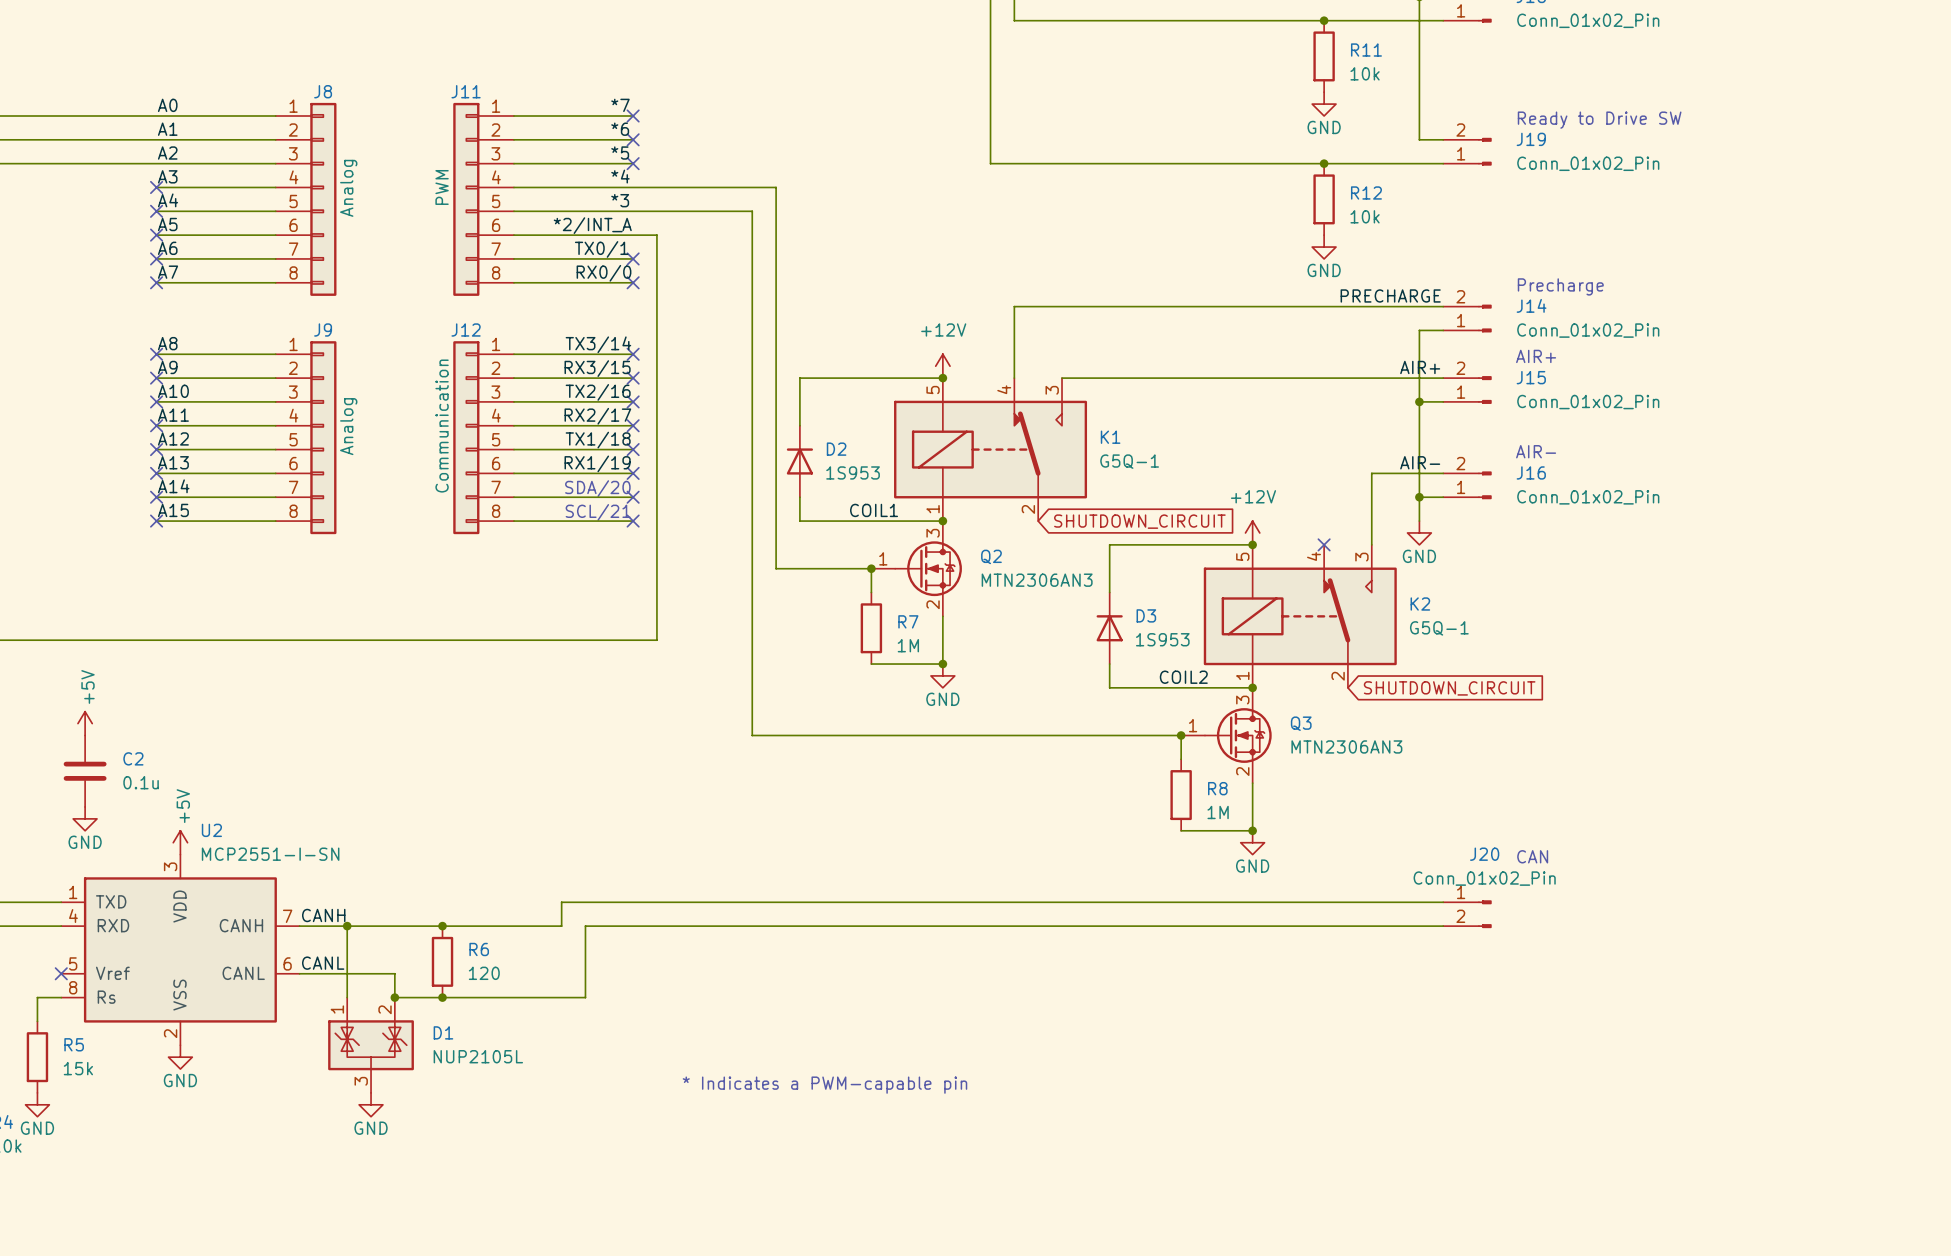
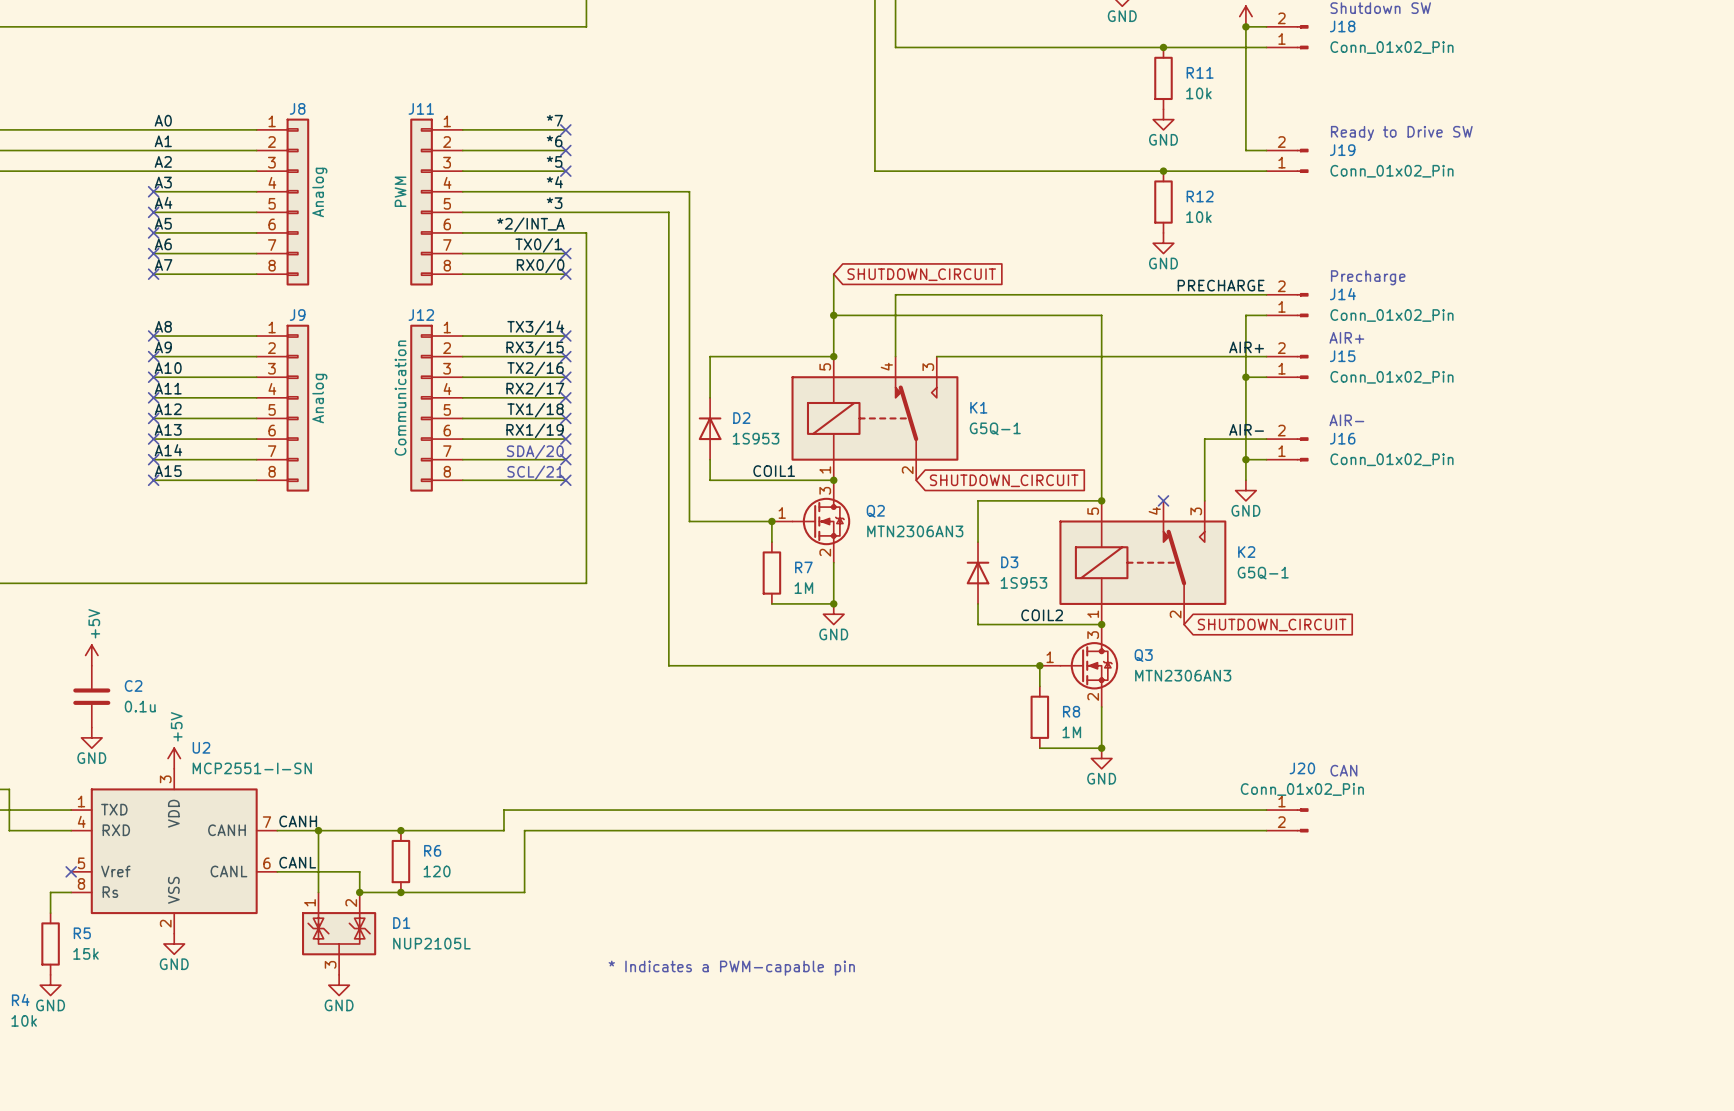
wire: none -> (833, 274) (833, 356)
global label: none -> SHUTDOWN_CIRCUIT (921, 274)
wire: none -> (833, 315) (1101, 315) (1101, 500)
junction: none -> (833, 315)
power symbol: +12V (942, 366) -> none
power symbol: +12V (1252, 532) -> none

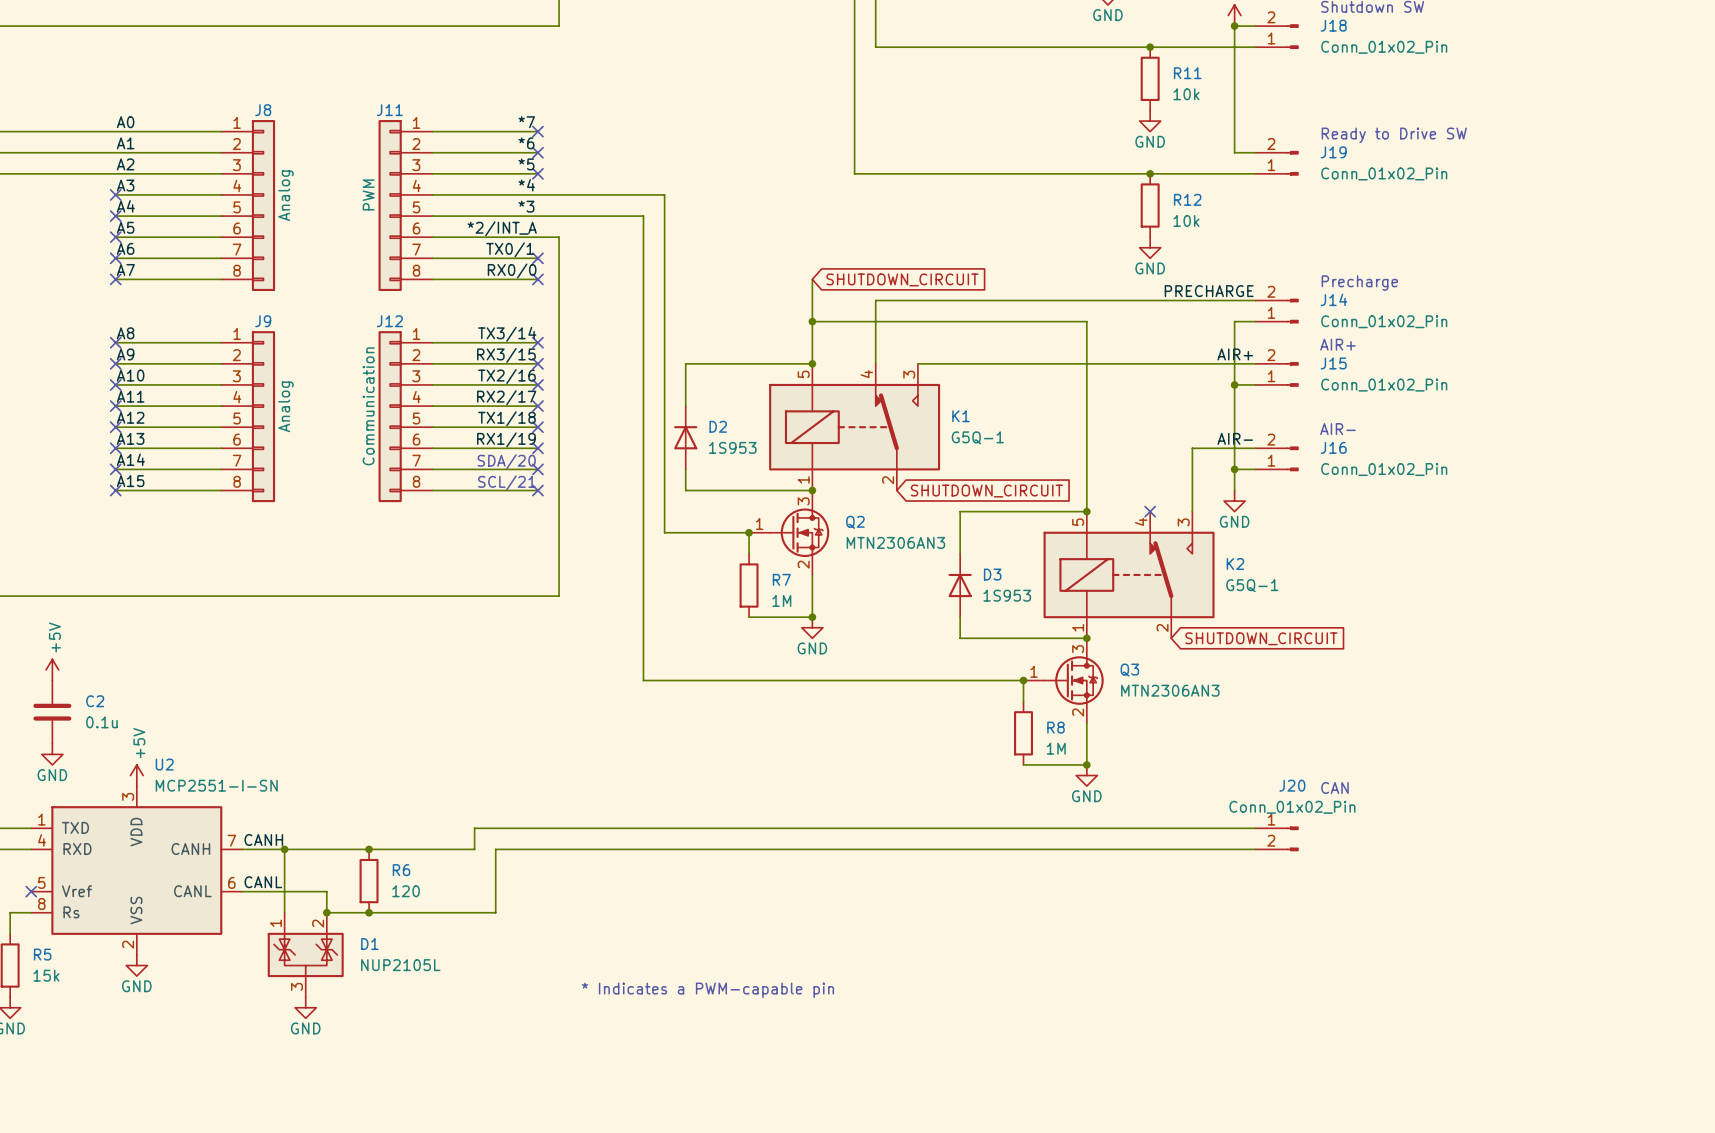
label: COIL1 (774, 471) -> none
label: COIL2 (1042, 615) -> none

